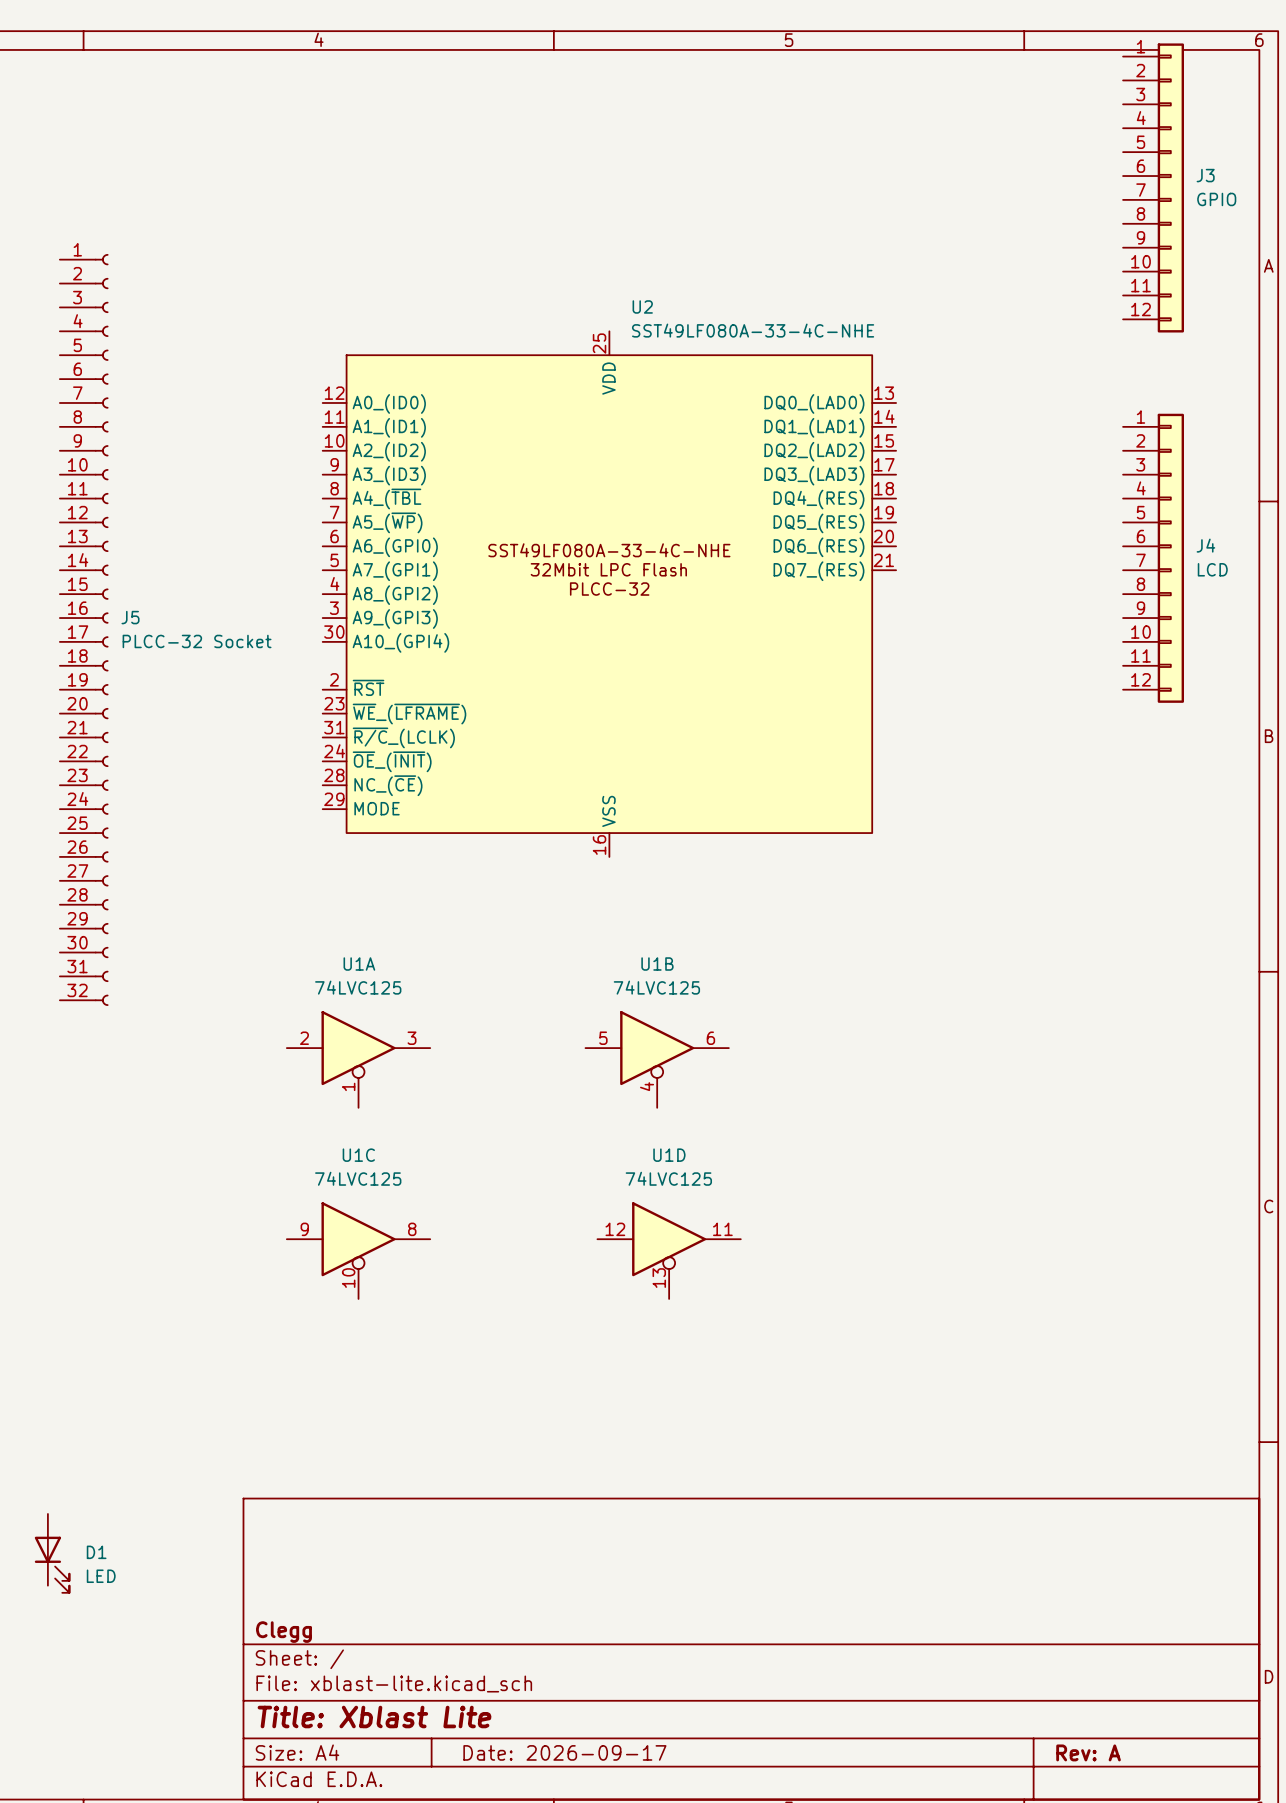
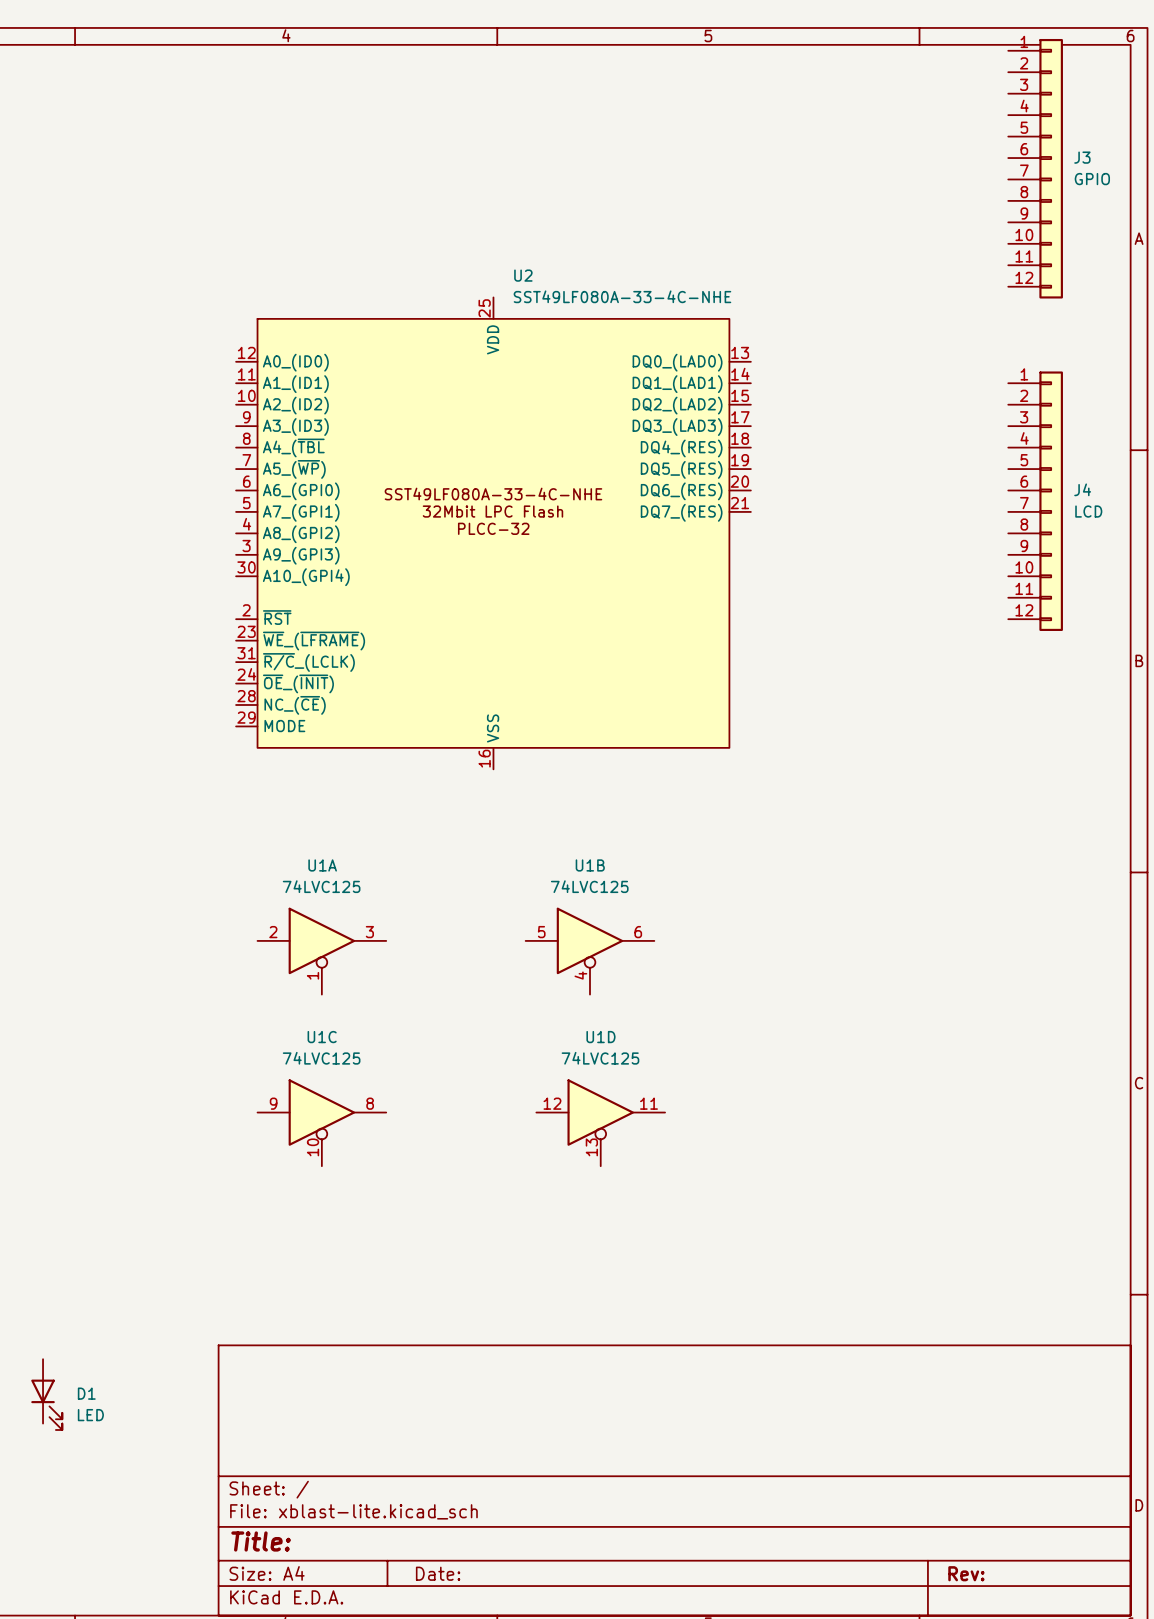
U2 position: (609, 594) -> (493, 533)
J5: PLCC-32 Socket (84, 629) -> none
title block: Clegg (283, 1632) -> none
title block: Title: Xblast Lite (374, 1717) -> Title: (261, 1541)
title block: Date: 2026-09-17 (564, 1752) -> Date: (438, 1573)
title block: Rev: A (1088, 1752) -> Rev: (966, 1573)

